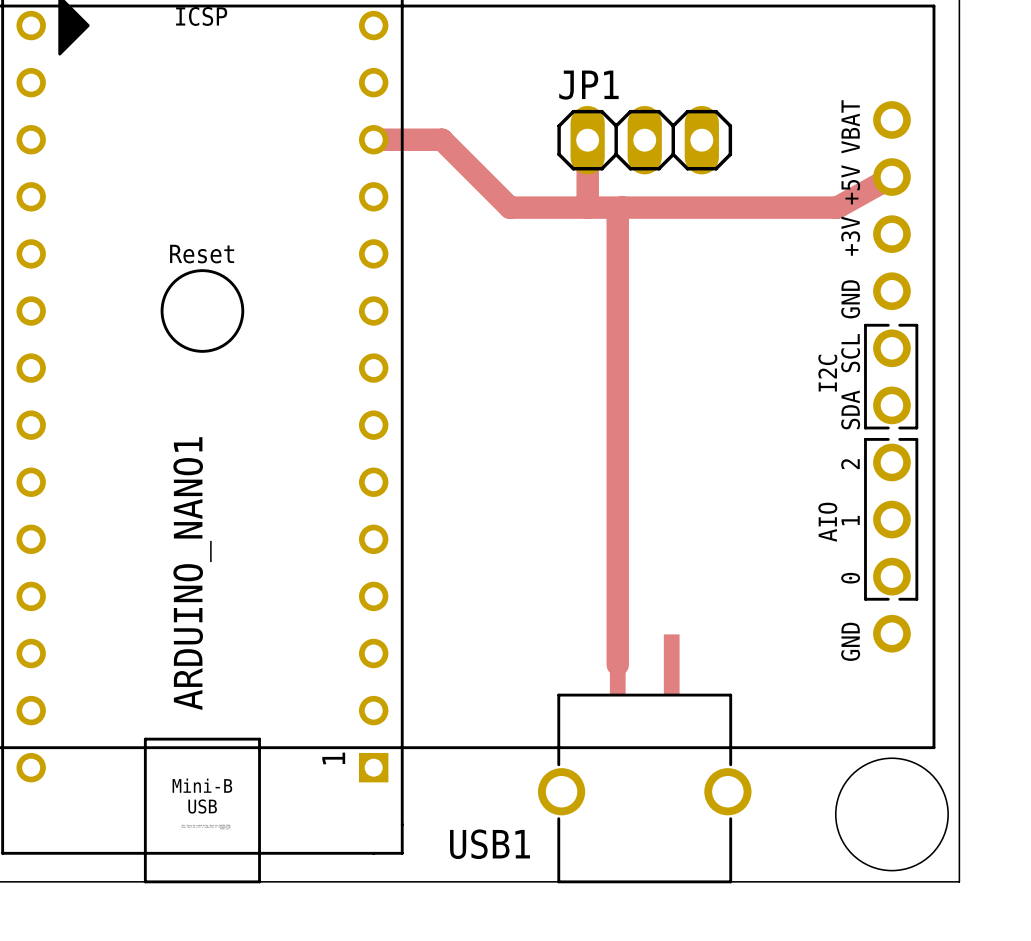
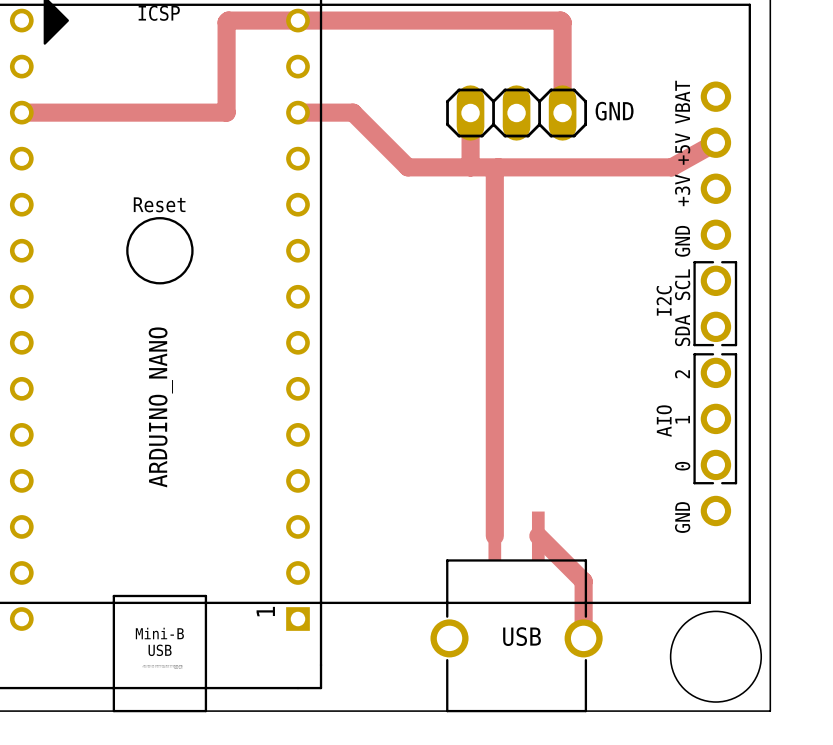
JP1 name: JP1 (588, 85) -> none
text: none -> GND (614, 111)
track: none -> (21, 112) (226, 112) (226, 22) (228, 20) (560, 20) (562, 22) (562, 112)
ARDUINO_NANO1 name: ARDUINO_NANO1 (192, 573) -> ARDUINO_NANO (160, 407)
track: none -> (538, 536) (583, 581) (583, 638)
USB1 name: USB1 (490, 844) -> USB (522, 636)

